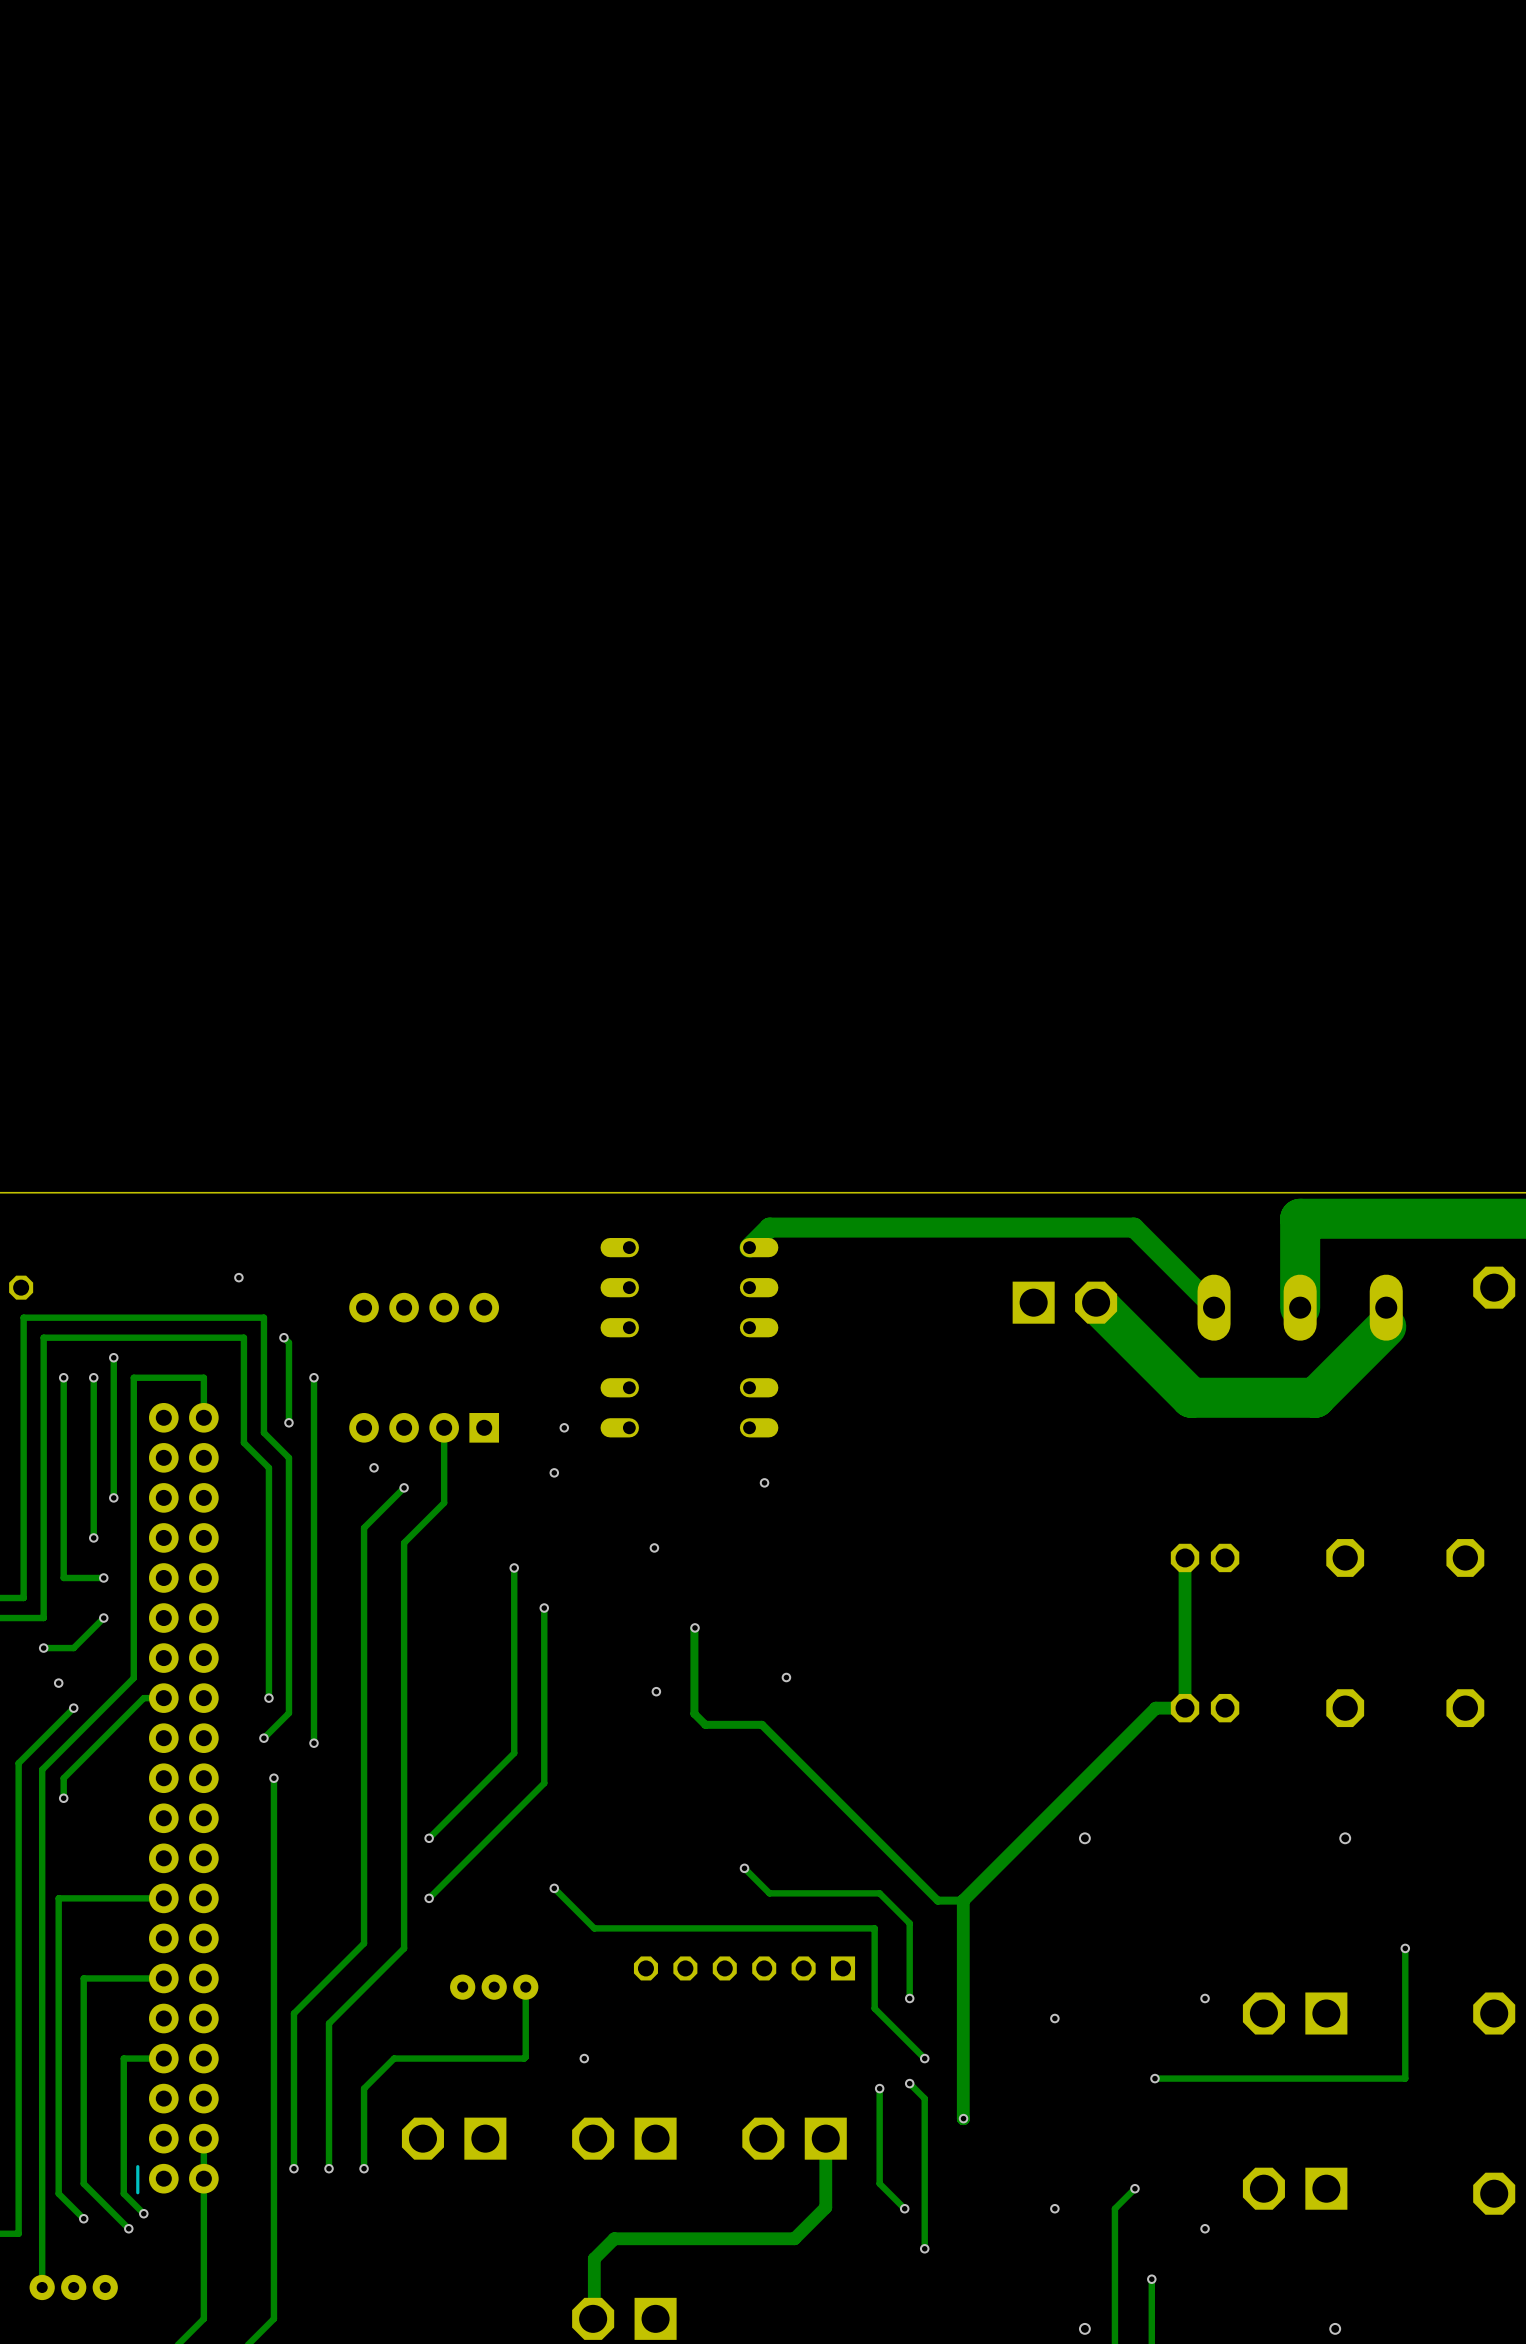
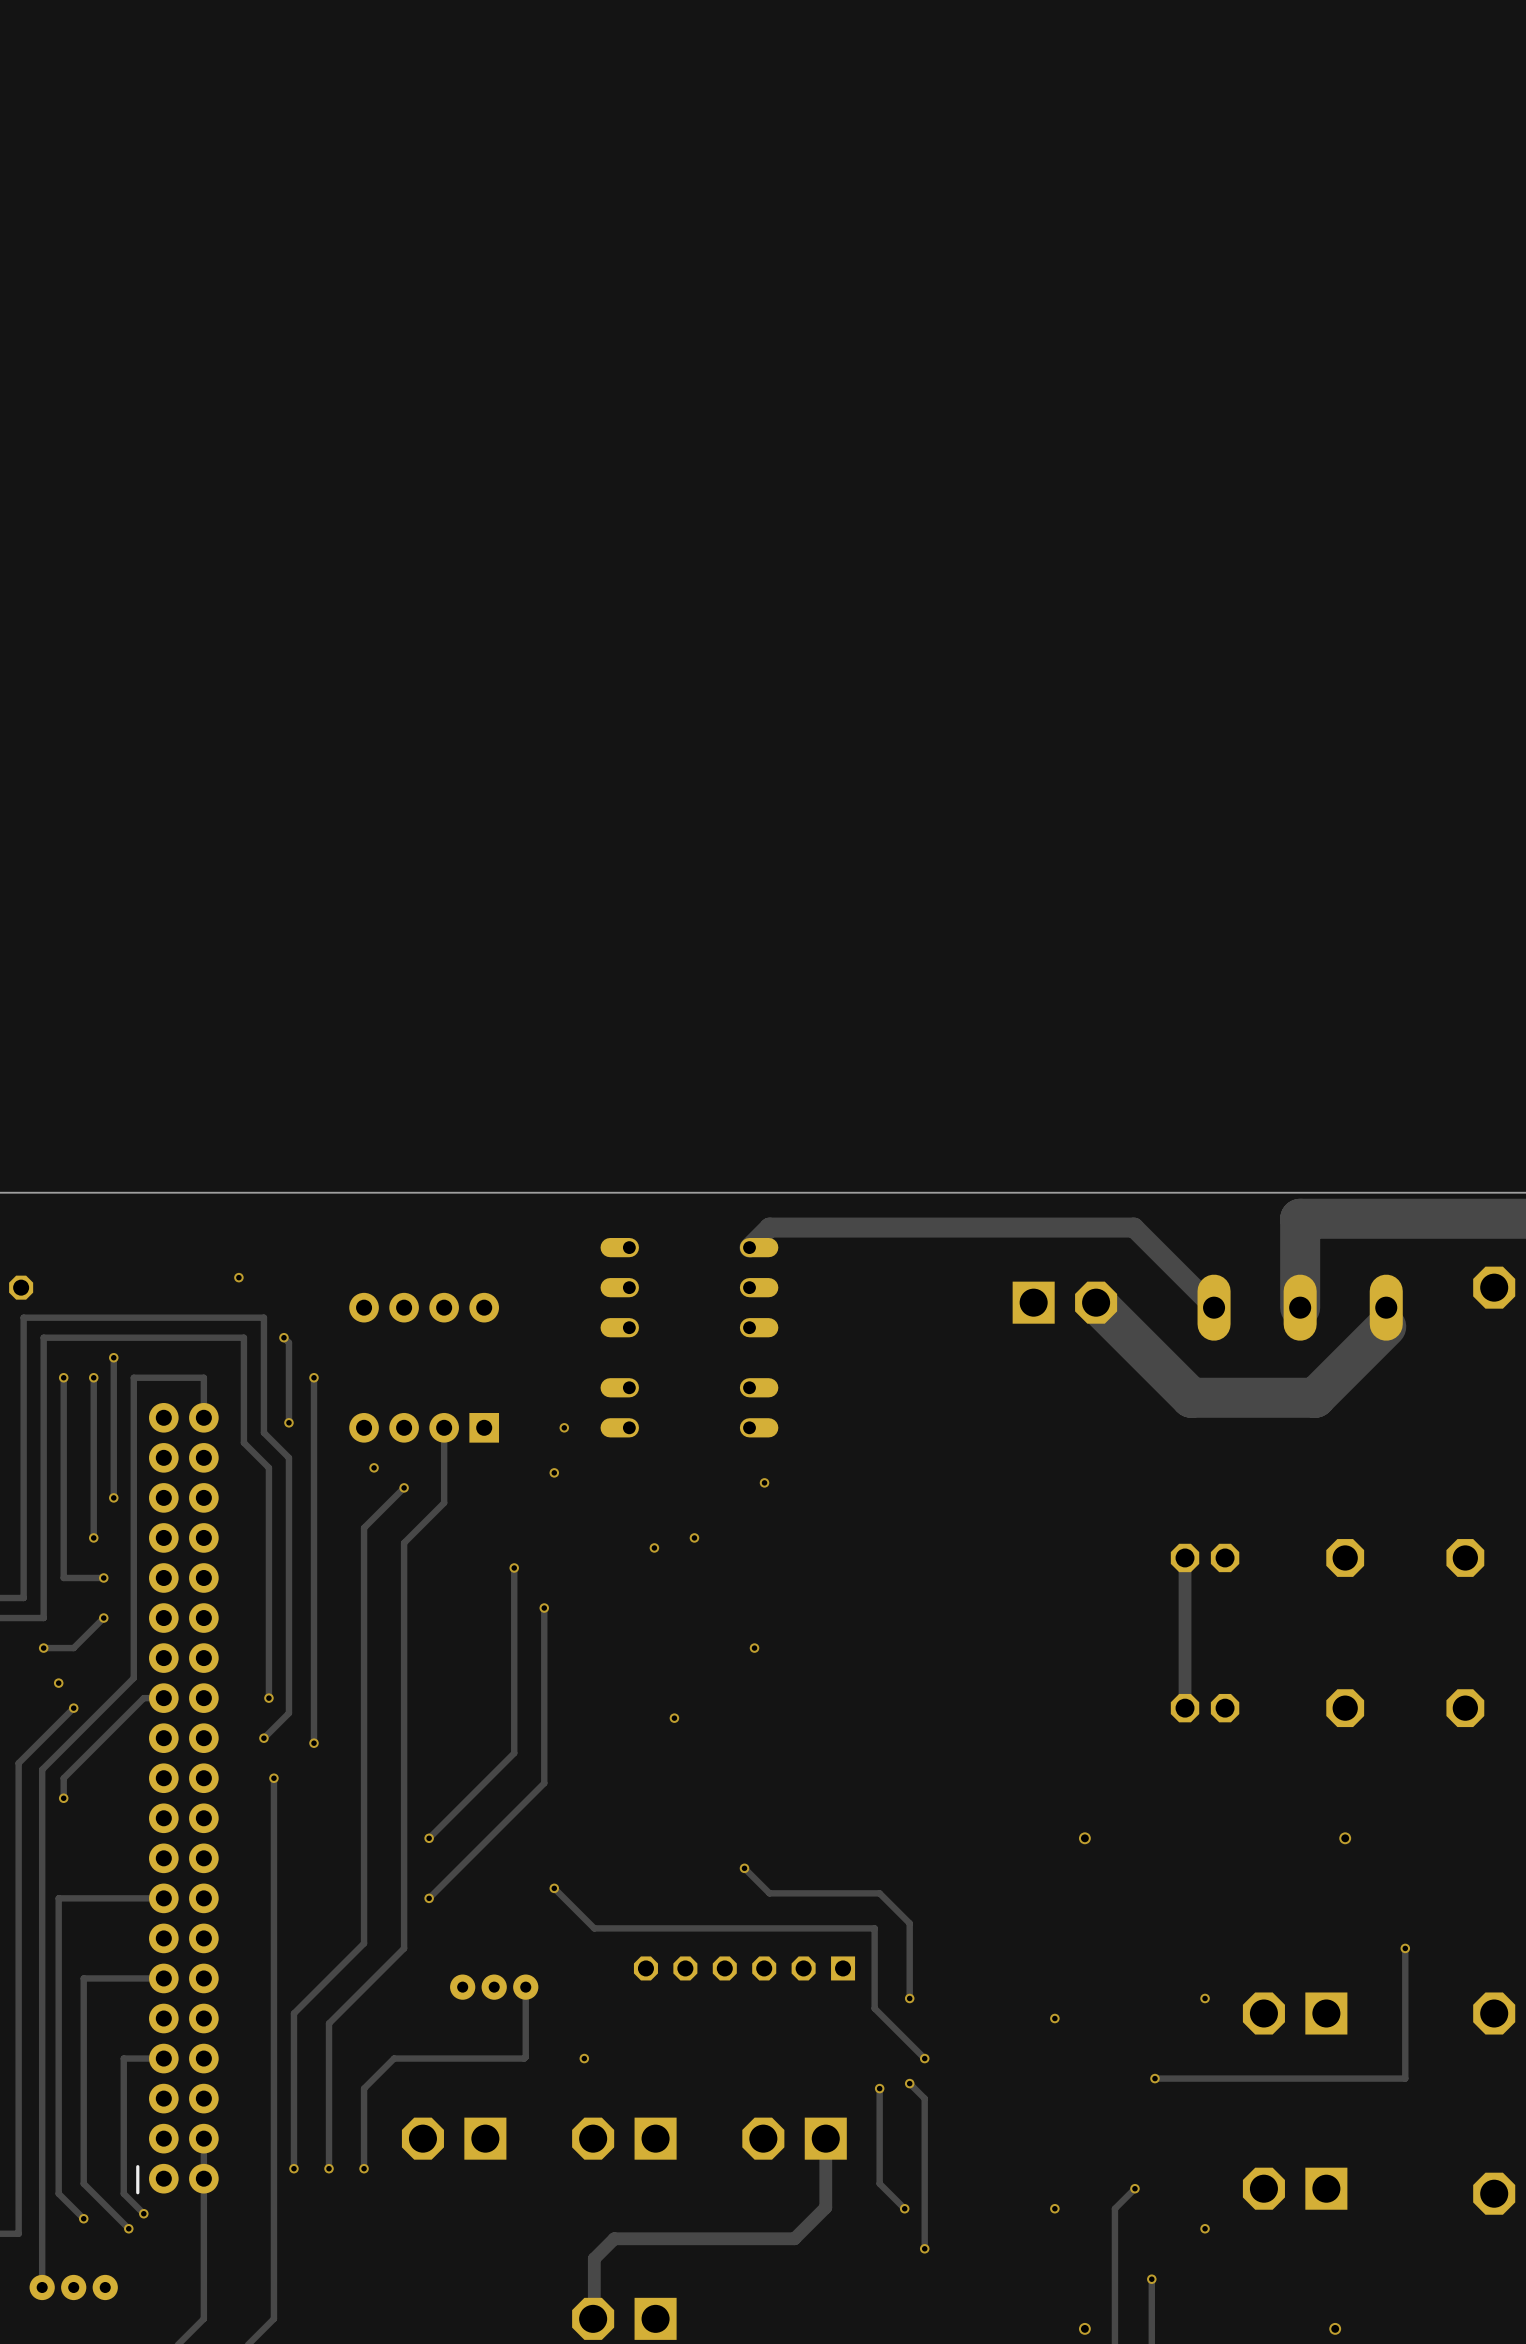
via: none -> (694, 1537)
track: (695, 1627) (694, 1713) (705, 1724) (762, 1724) (937, 1900) (963, 1900) -> none
via: (695, 1627) -> none
via: none -> (754, 1648)
via: (786, 1677) -> none
via position: (656, 1691) -> (674, 1718)
track: (1185, 1708) (1155, 1708) (963, 1900) -> none
track: (963, 1900) (963, 2118) -> none
via: (963, 2118) -> none

